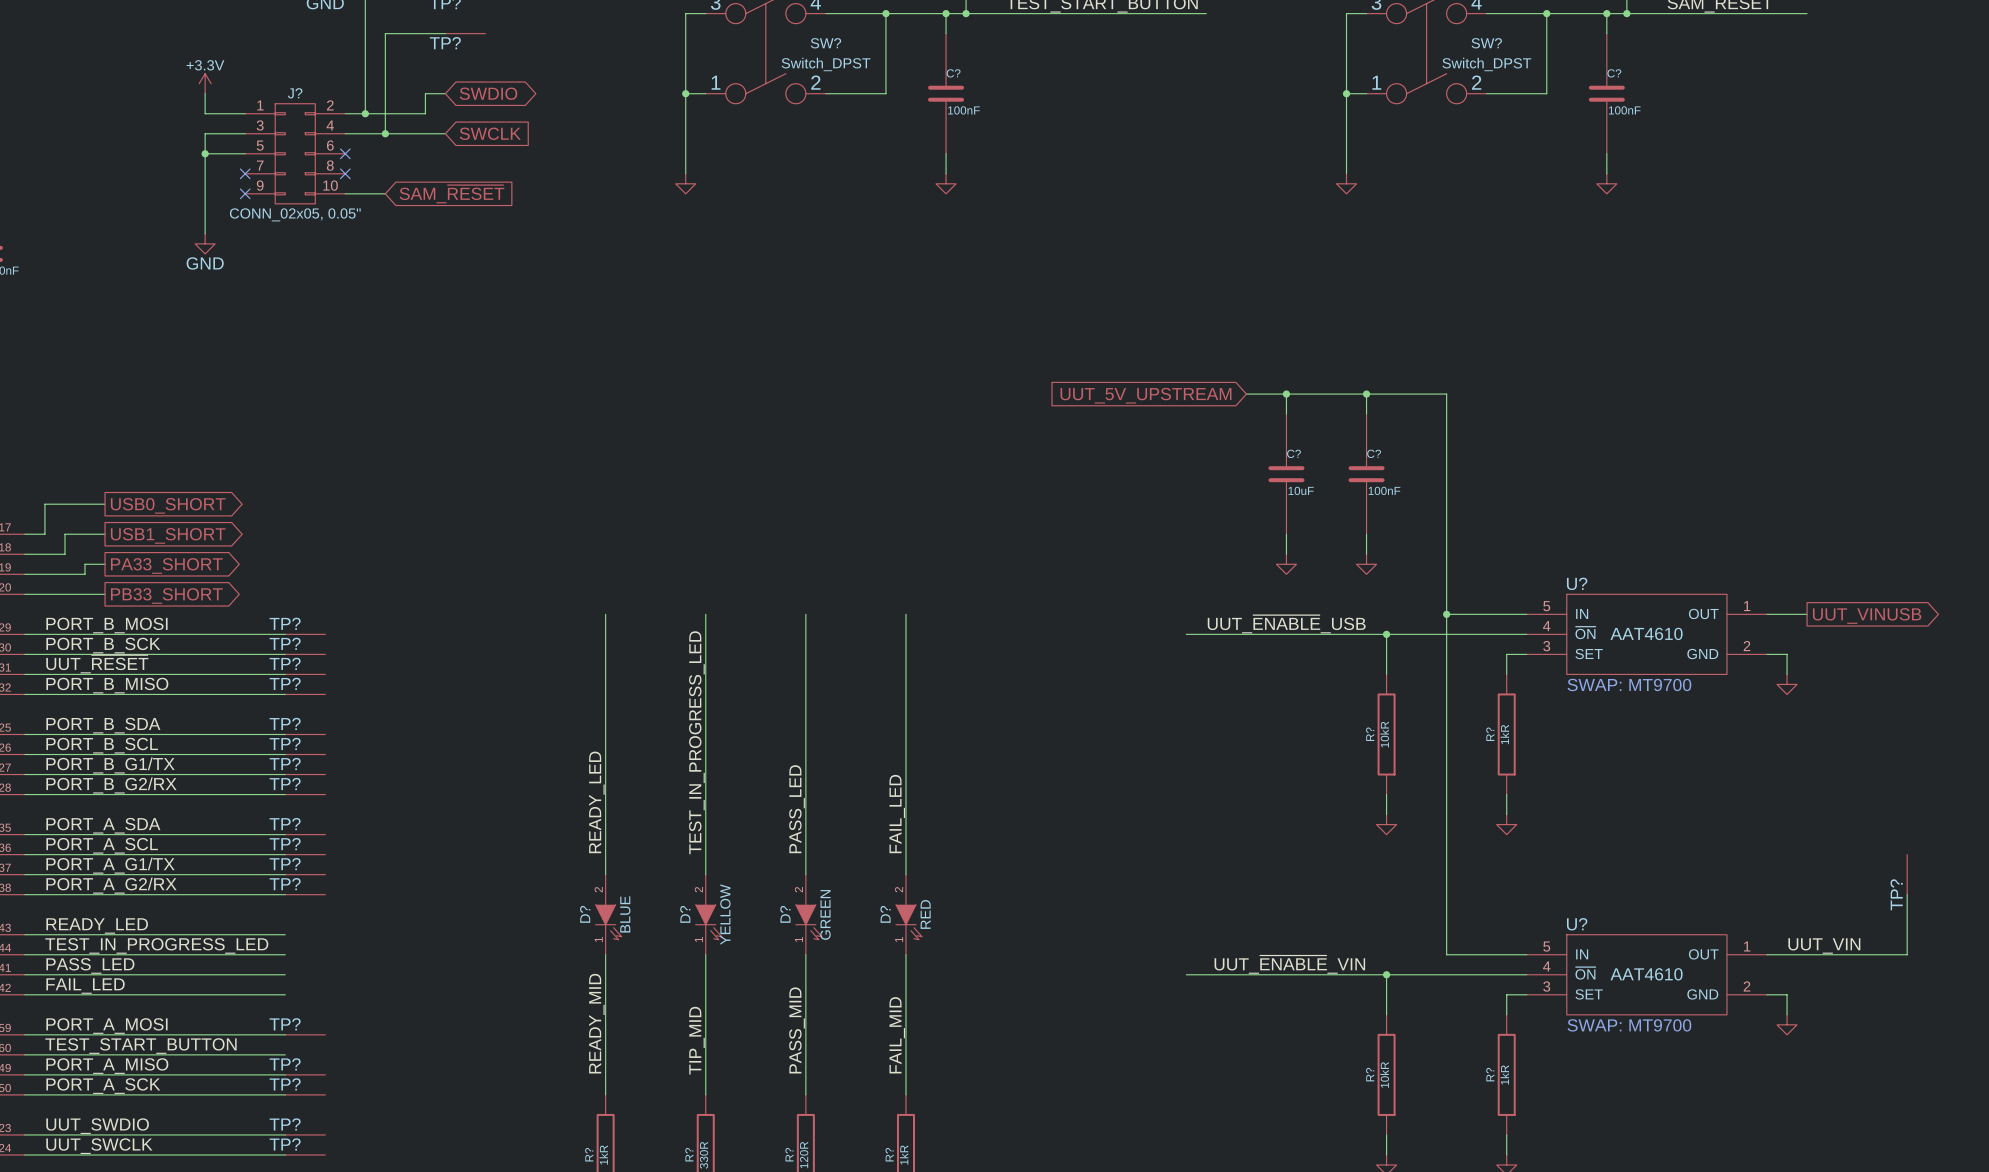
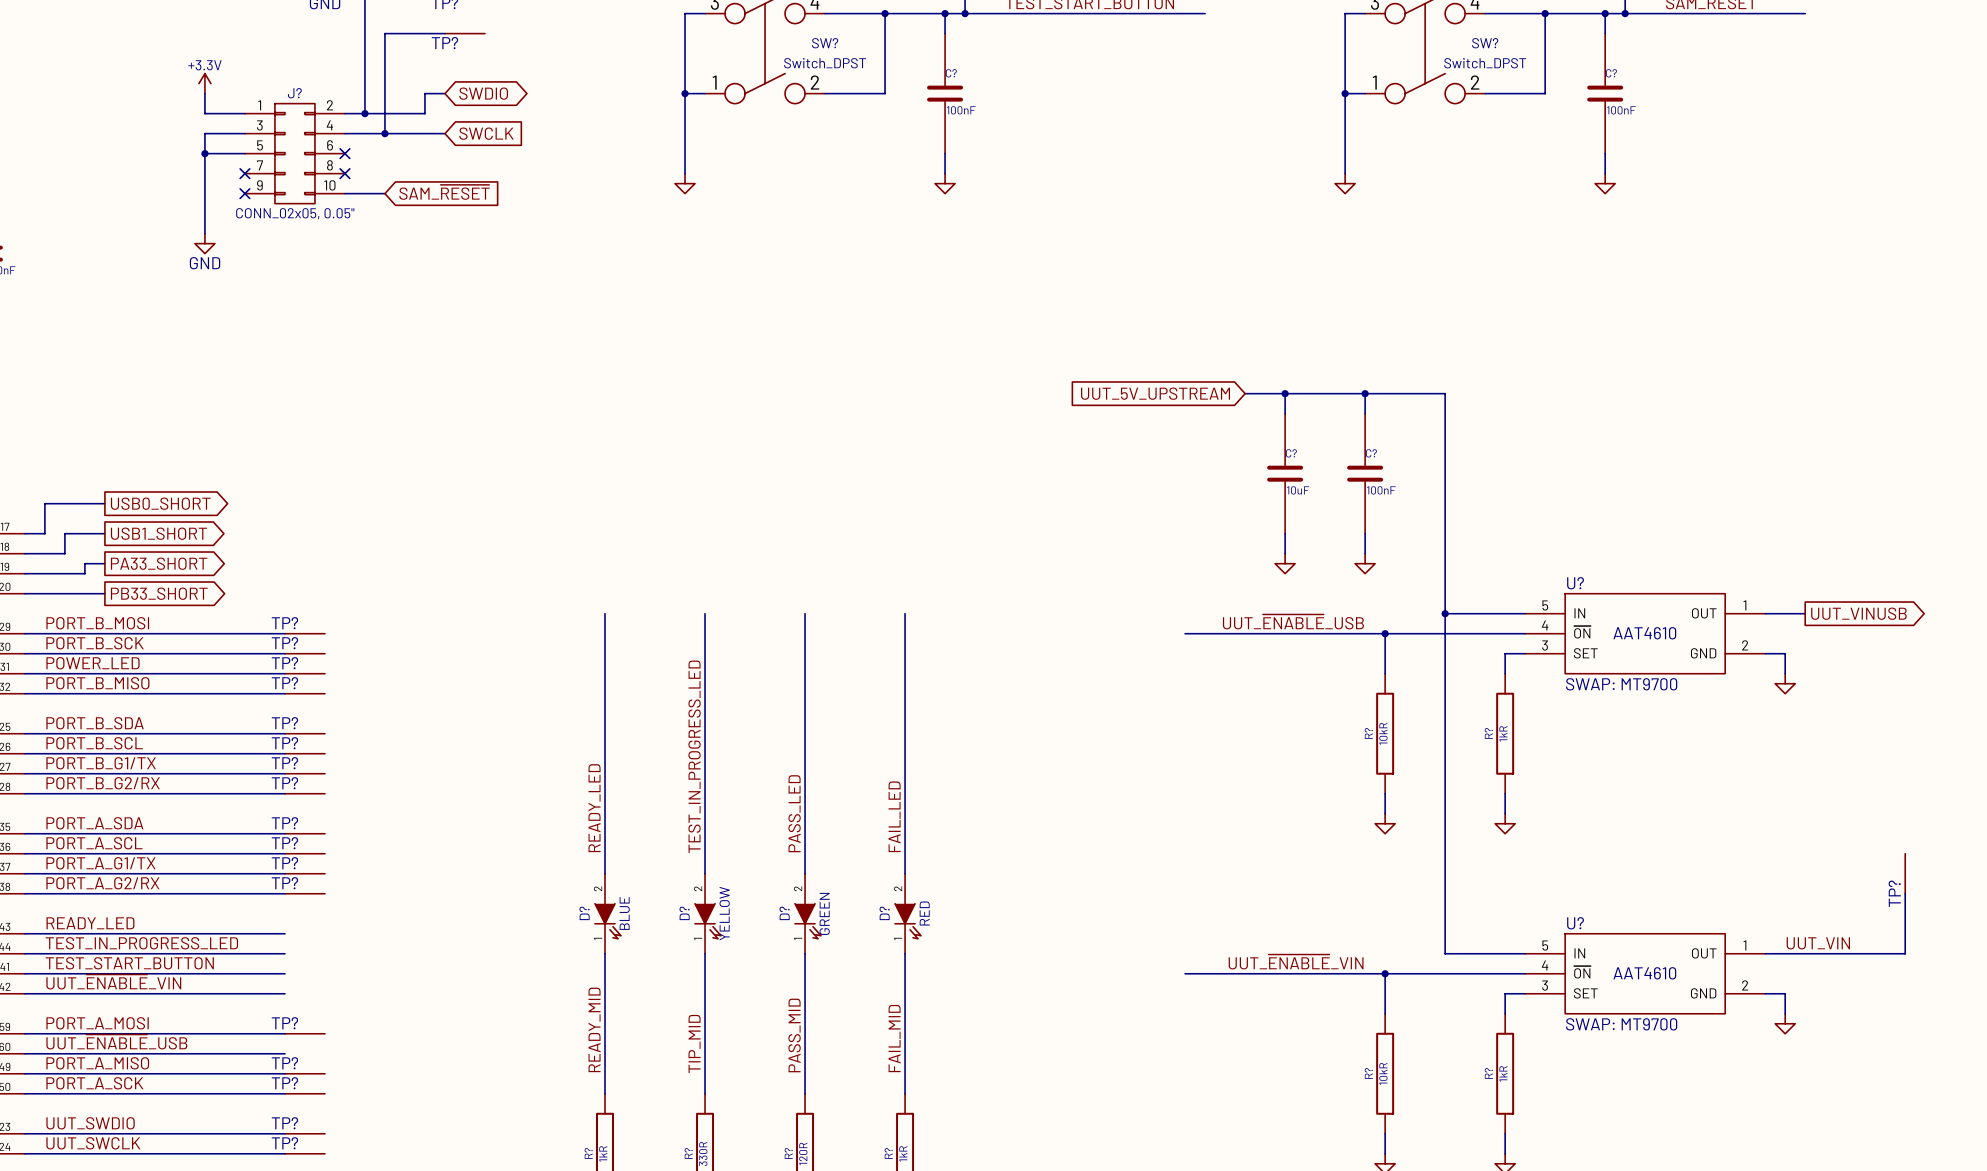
label: UUT_~{RESET} (97, 664) -> POWER_LED (92, 663)
label: PASS_LED (90, 965) -> TEST_START_BUTTON (129, 963)
label: FAIL_LED (85, 986) -> UUT_~{ENABLE}_VIN (113, 981)
label: TEST_START_BUTTON (140, 1046) -> UUT_~{ENABLE}_USB (116, 1041)

